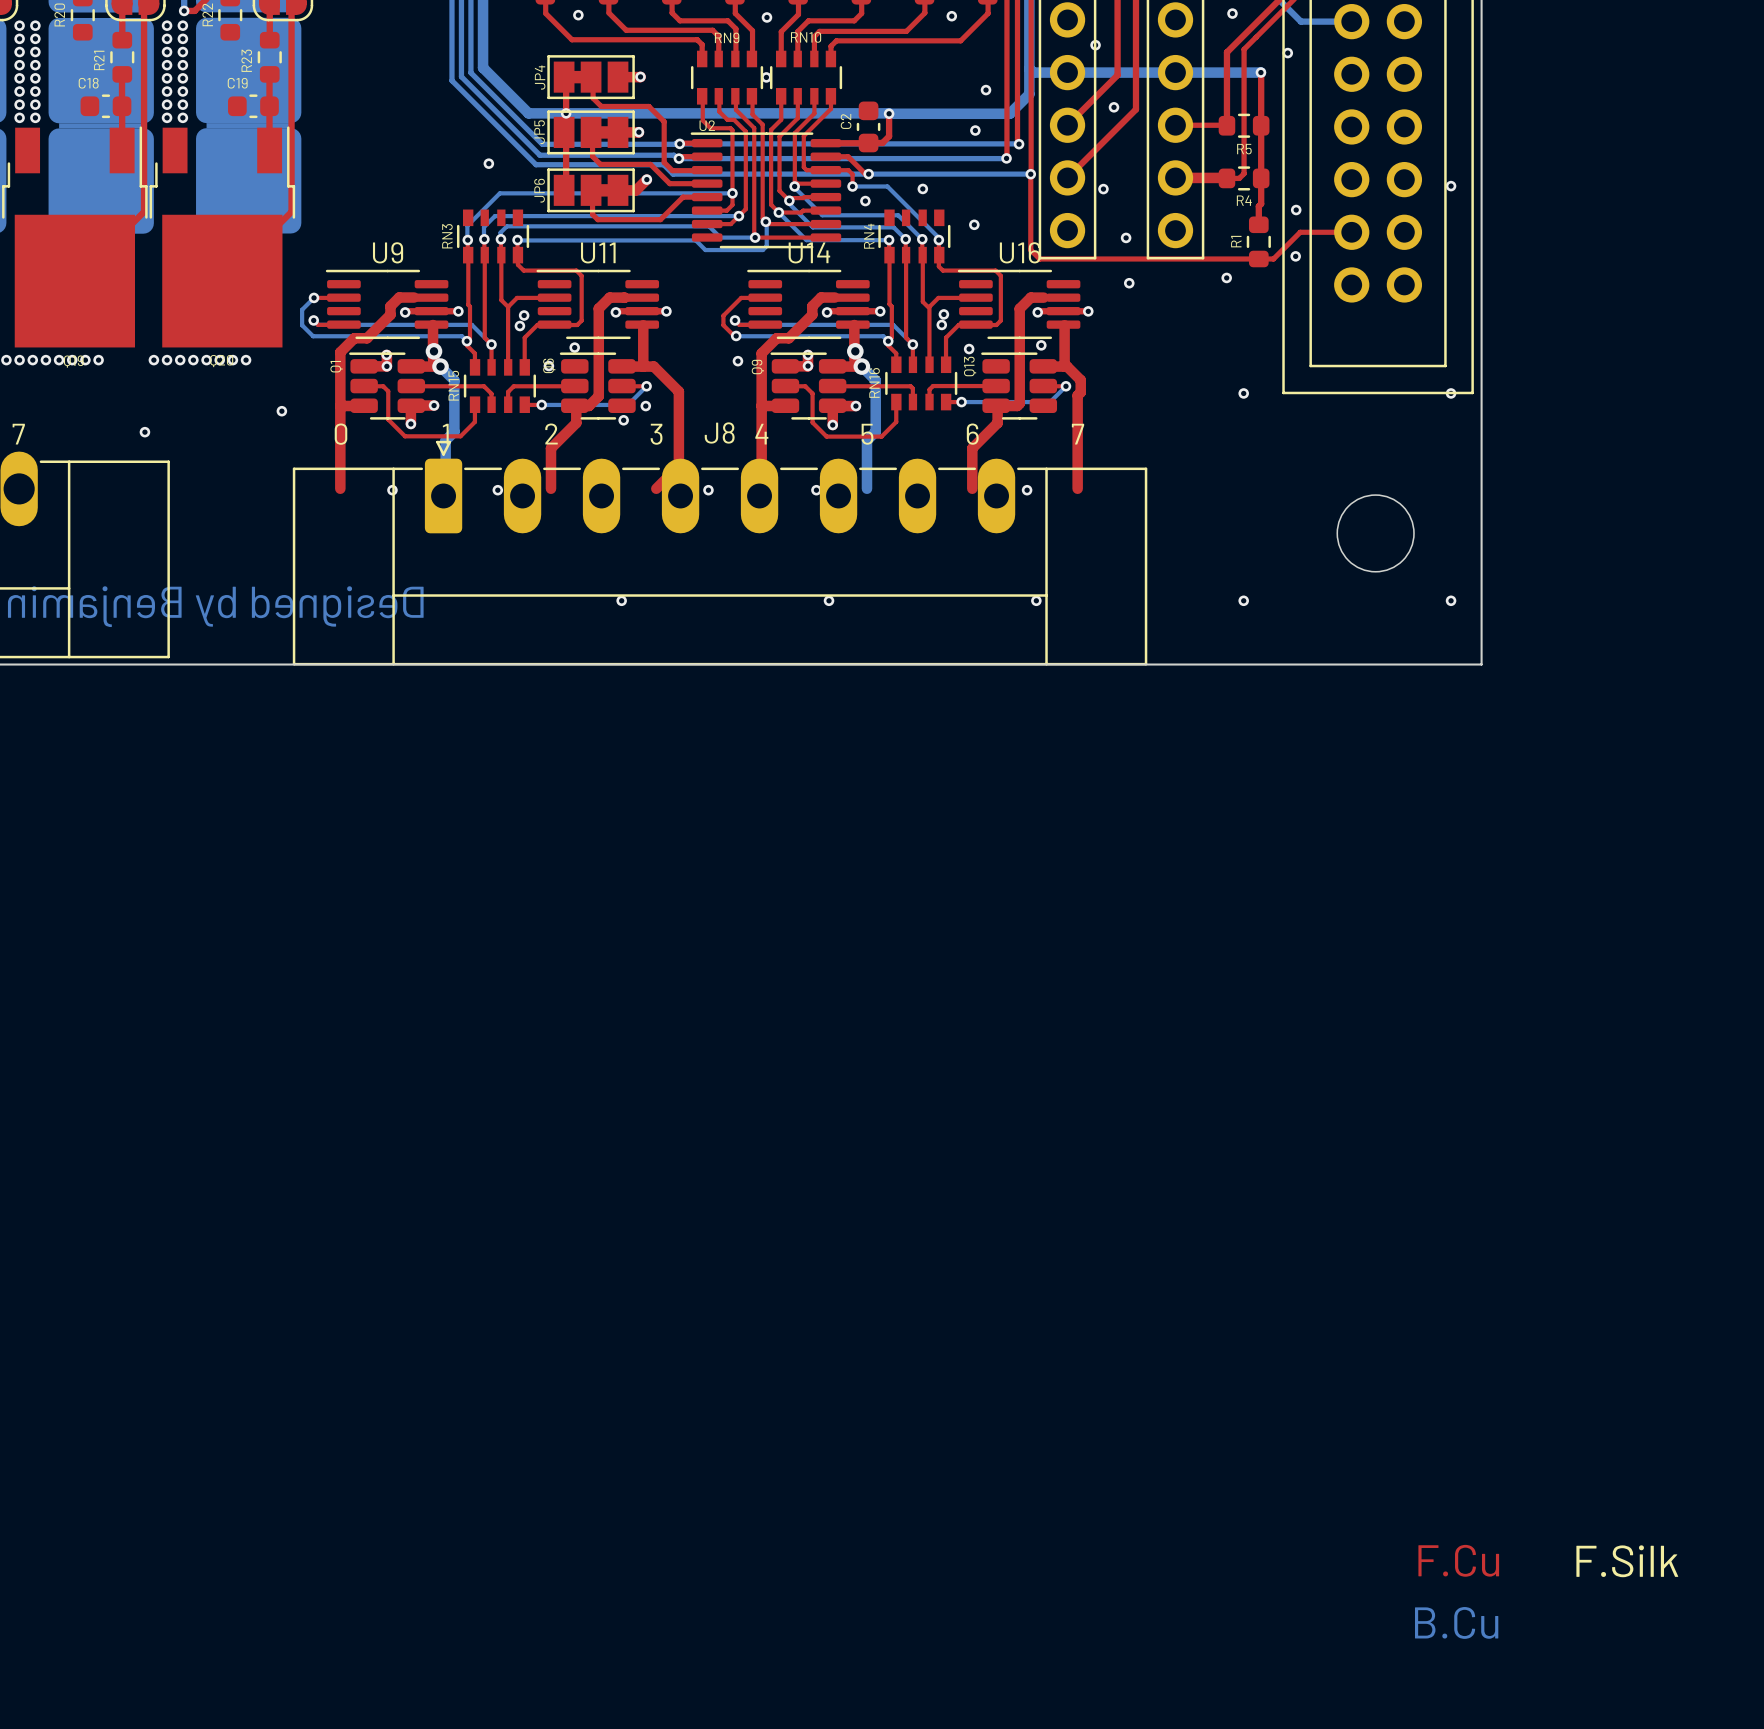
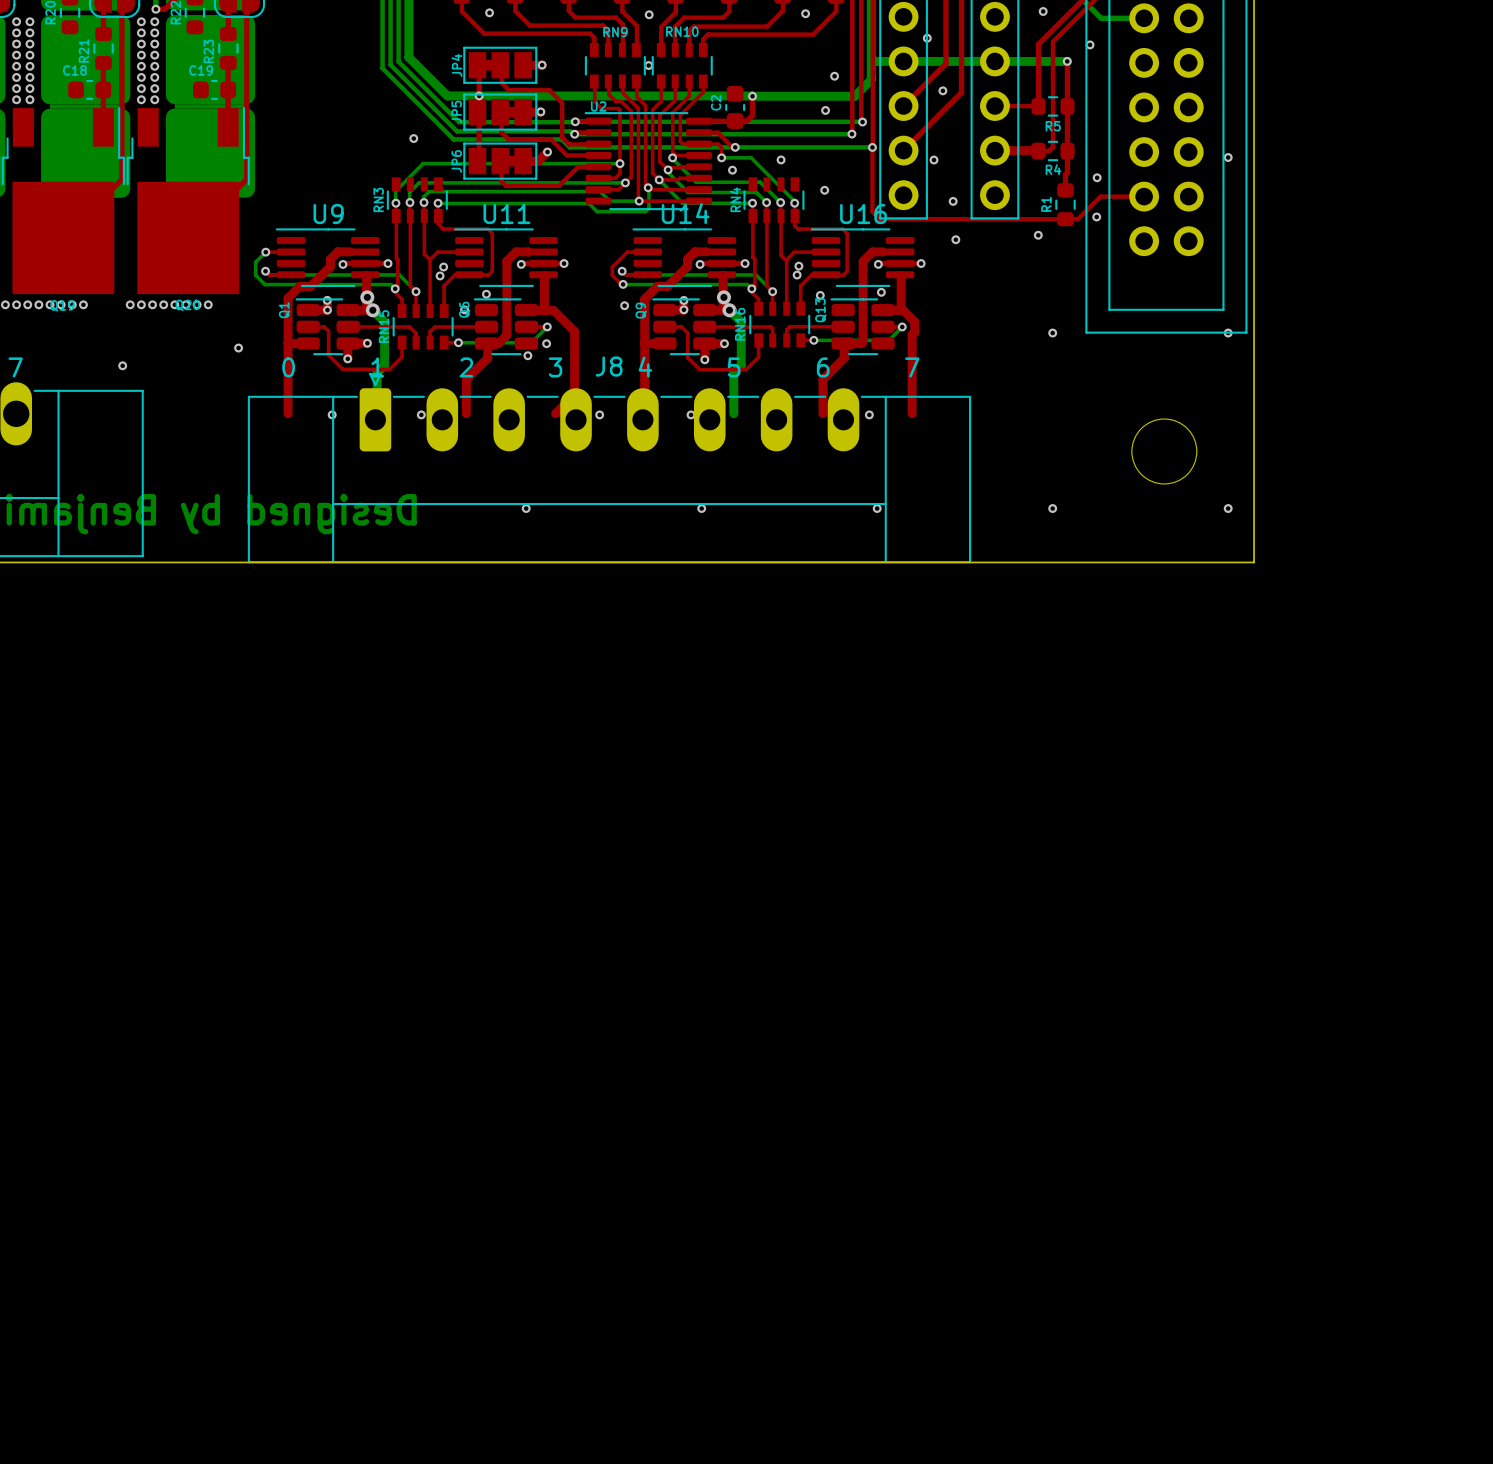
text: F.Cu (1458, 1560) -> none
text: F.Silk (1627, 1561) -> none
text: B.Cu (1456, 1622) -> none

